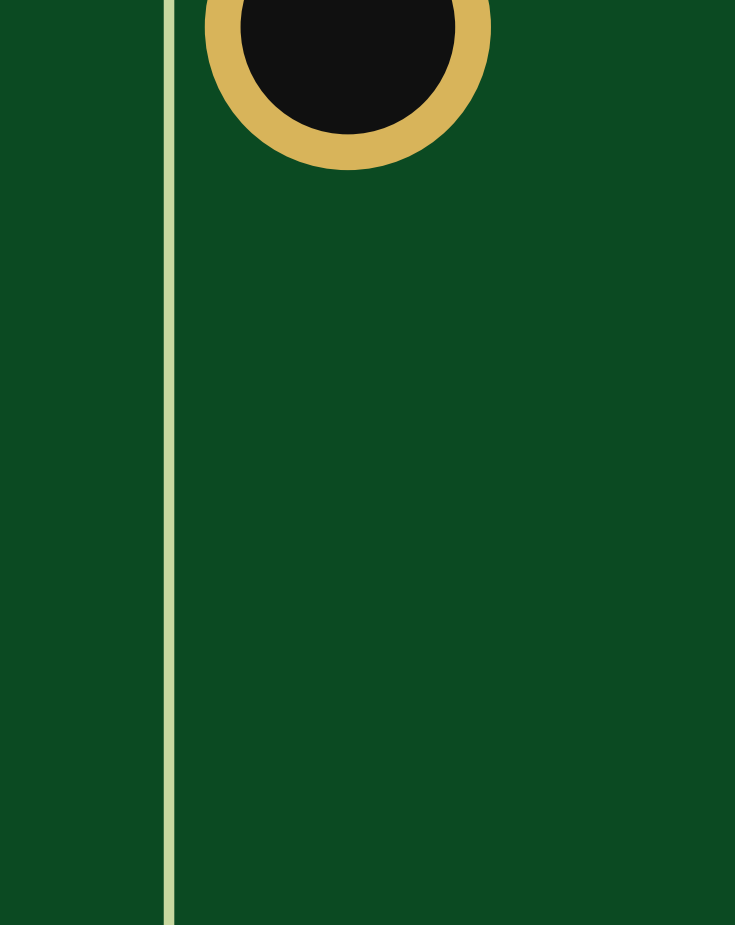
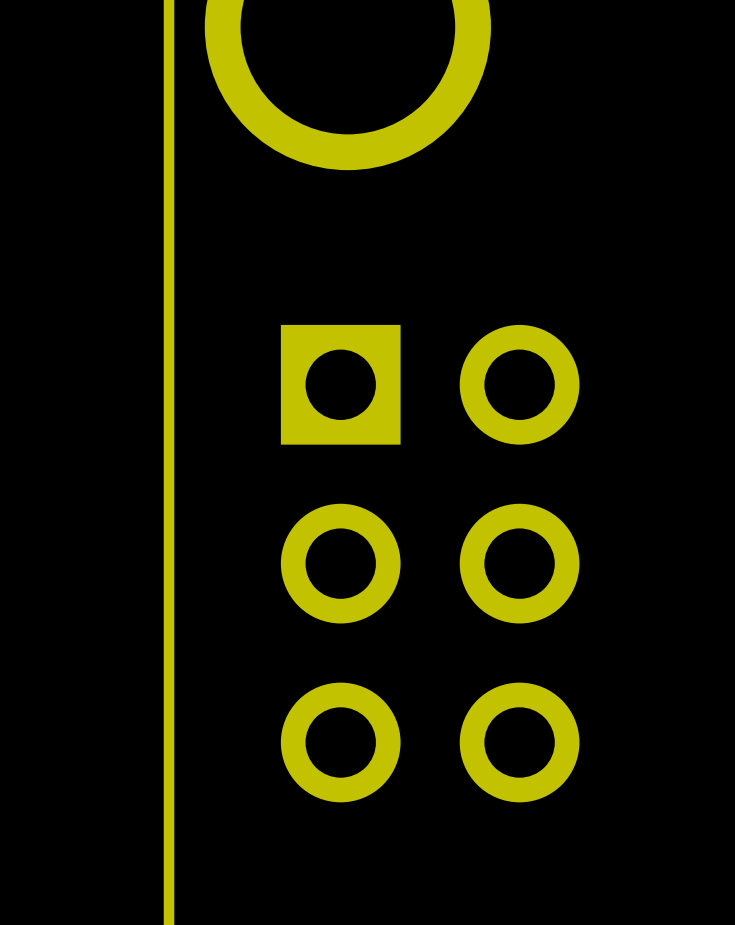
part: none -> (430, 563)

